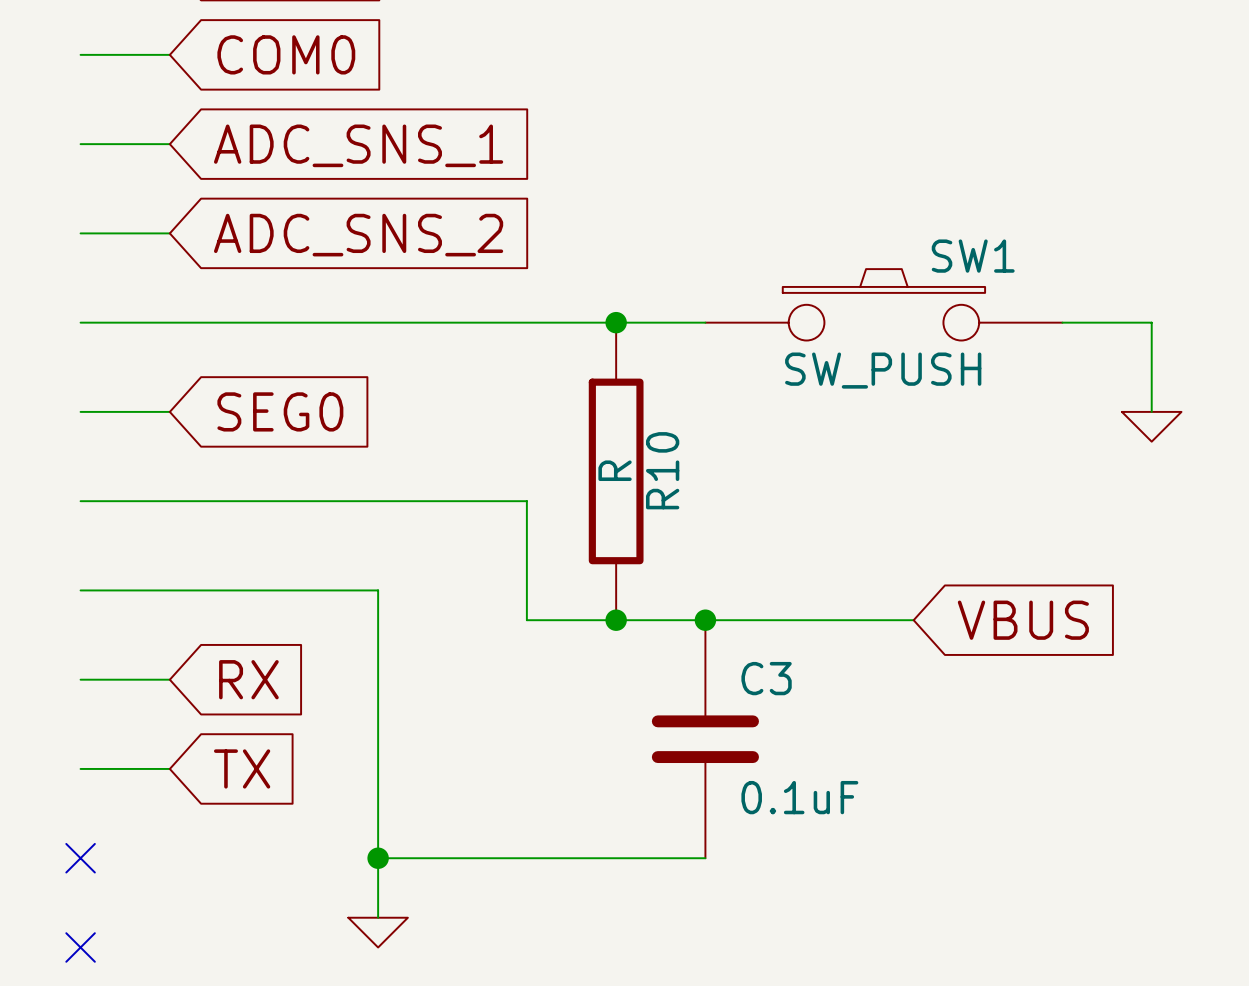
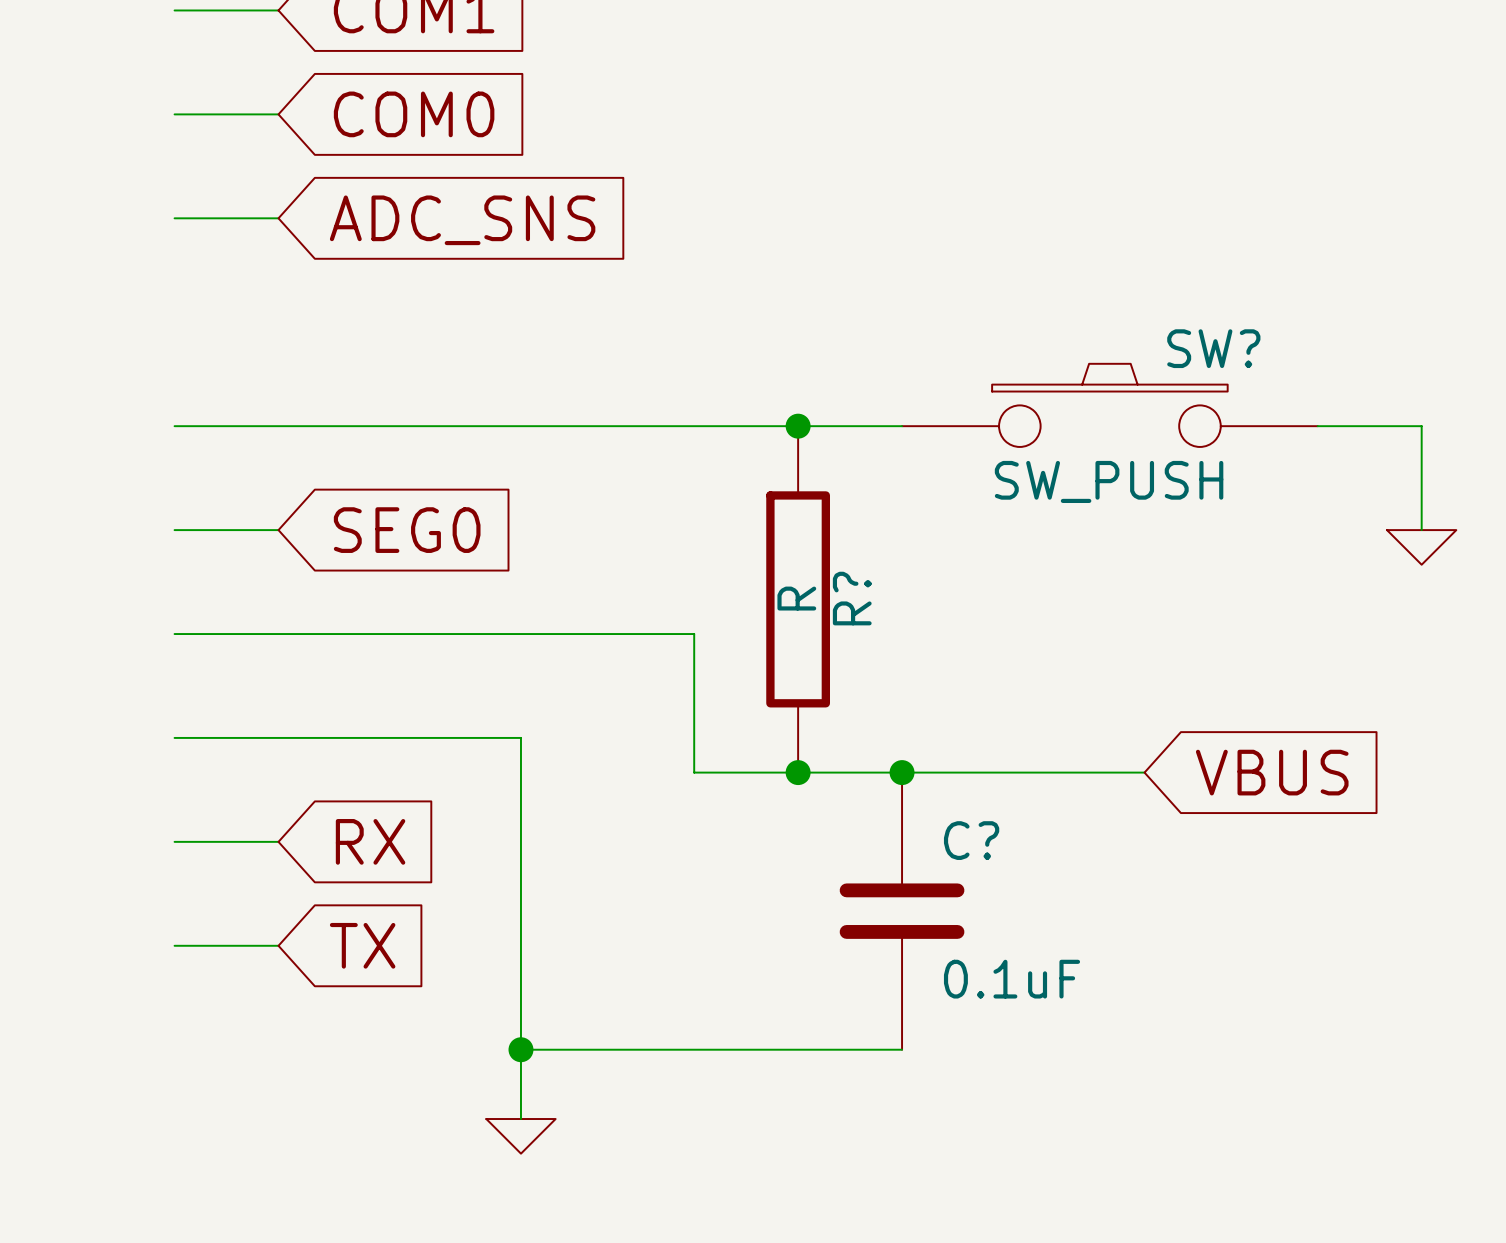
global label: ADC_SNS_1 (358, 145) -> ADC_SNS (462, 220)
wire: (80, 233) (169, 233) -> none
global label: ADC_SNS_2 (358, 235) -> none
SW1 name: SW1 (973, 256) -> SW? (1213, 348)
R10 name: R10 (662, 470) -> R? (852, 598)
C3 name: C3 (766, 678) -> C? (971, 840)
no-connect mark: (80, 858) -> none
no-connect mark: (80, 947) -> none

